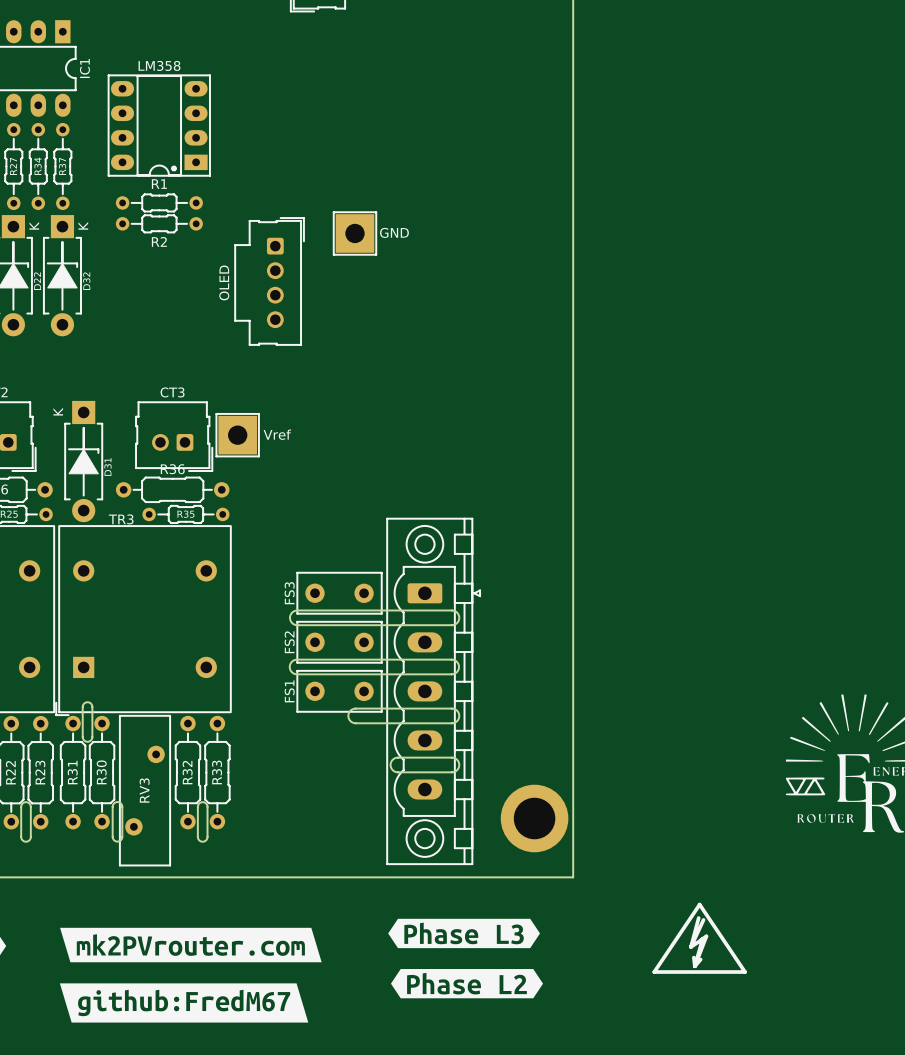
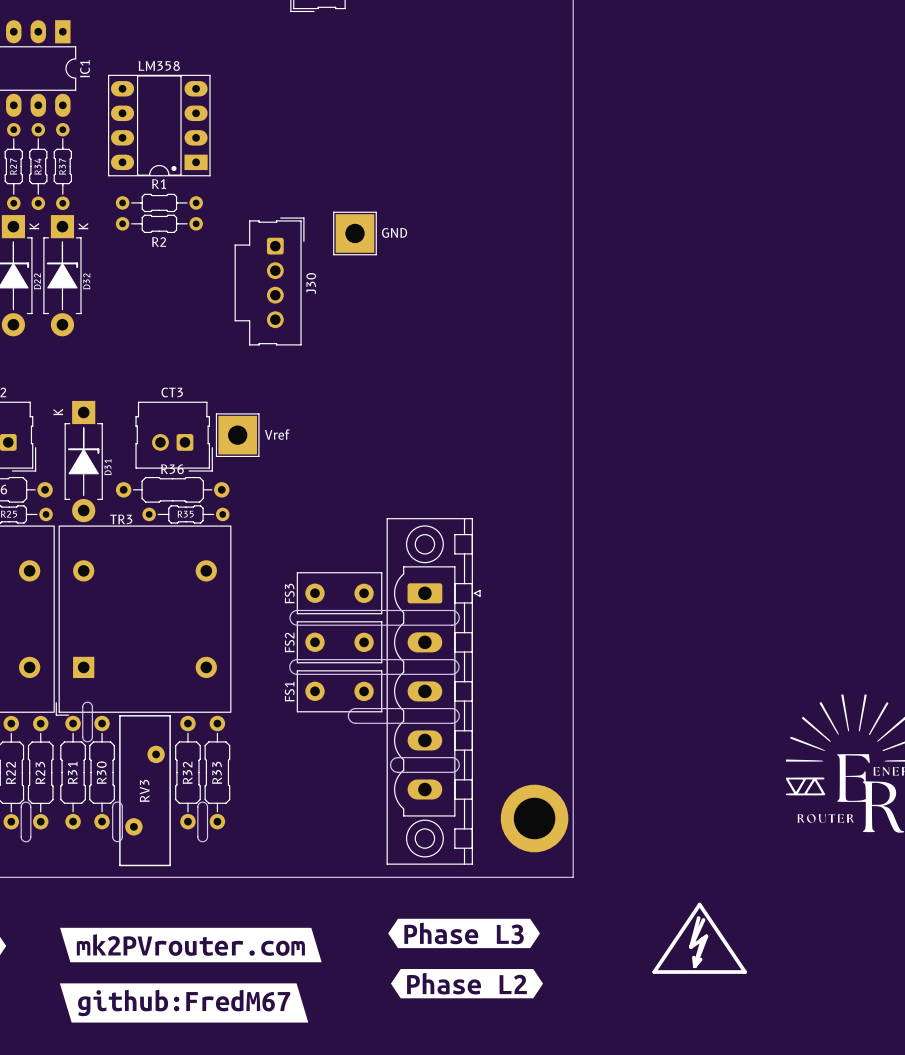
J30 value: OLED (224, 282) -> none
J30 name: none -> J30 (311, 283)

